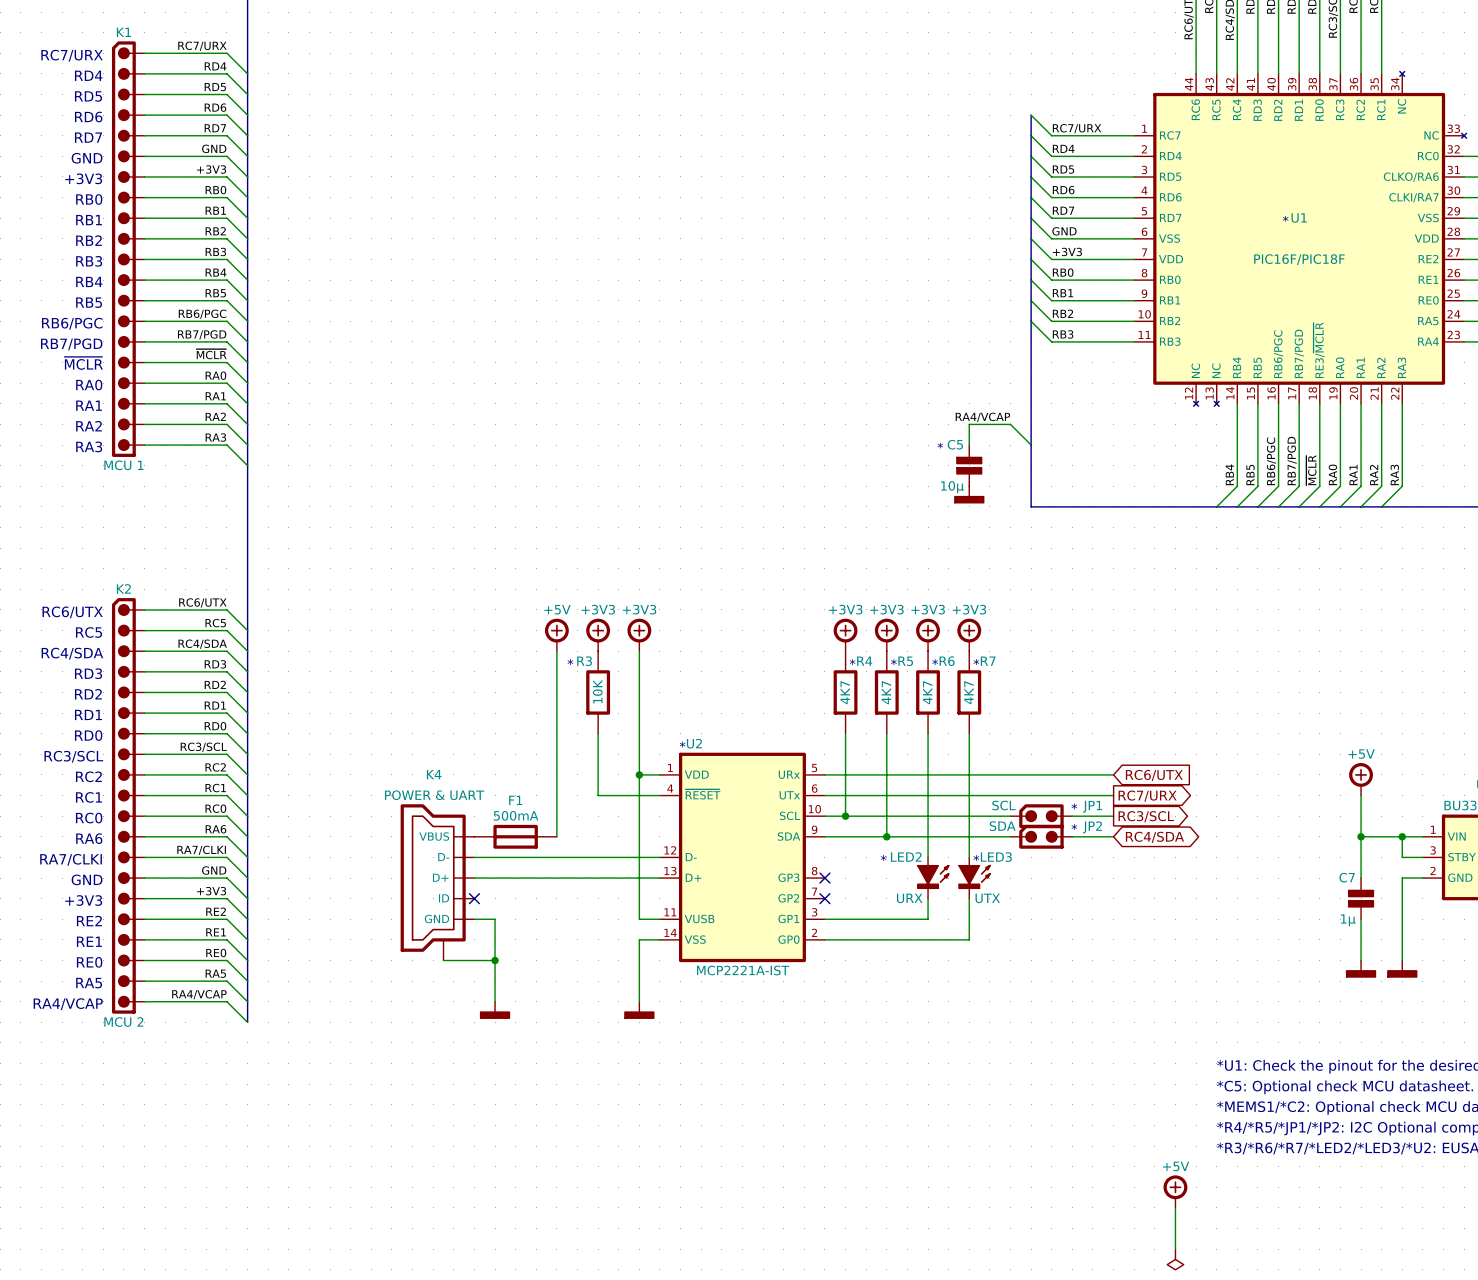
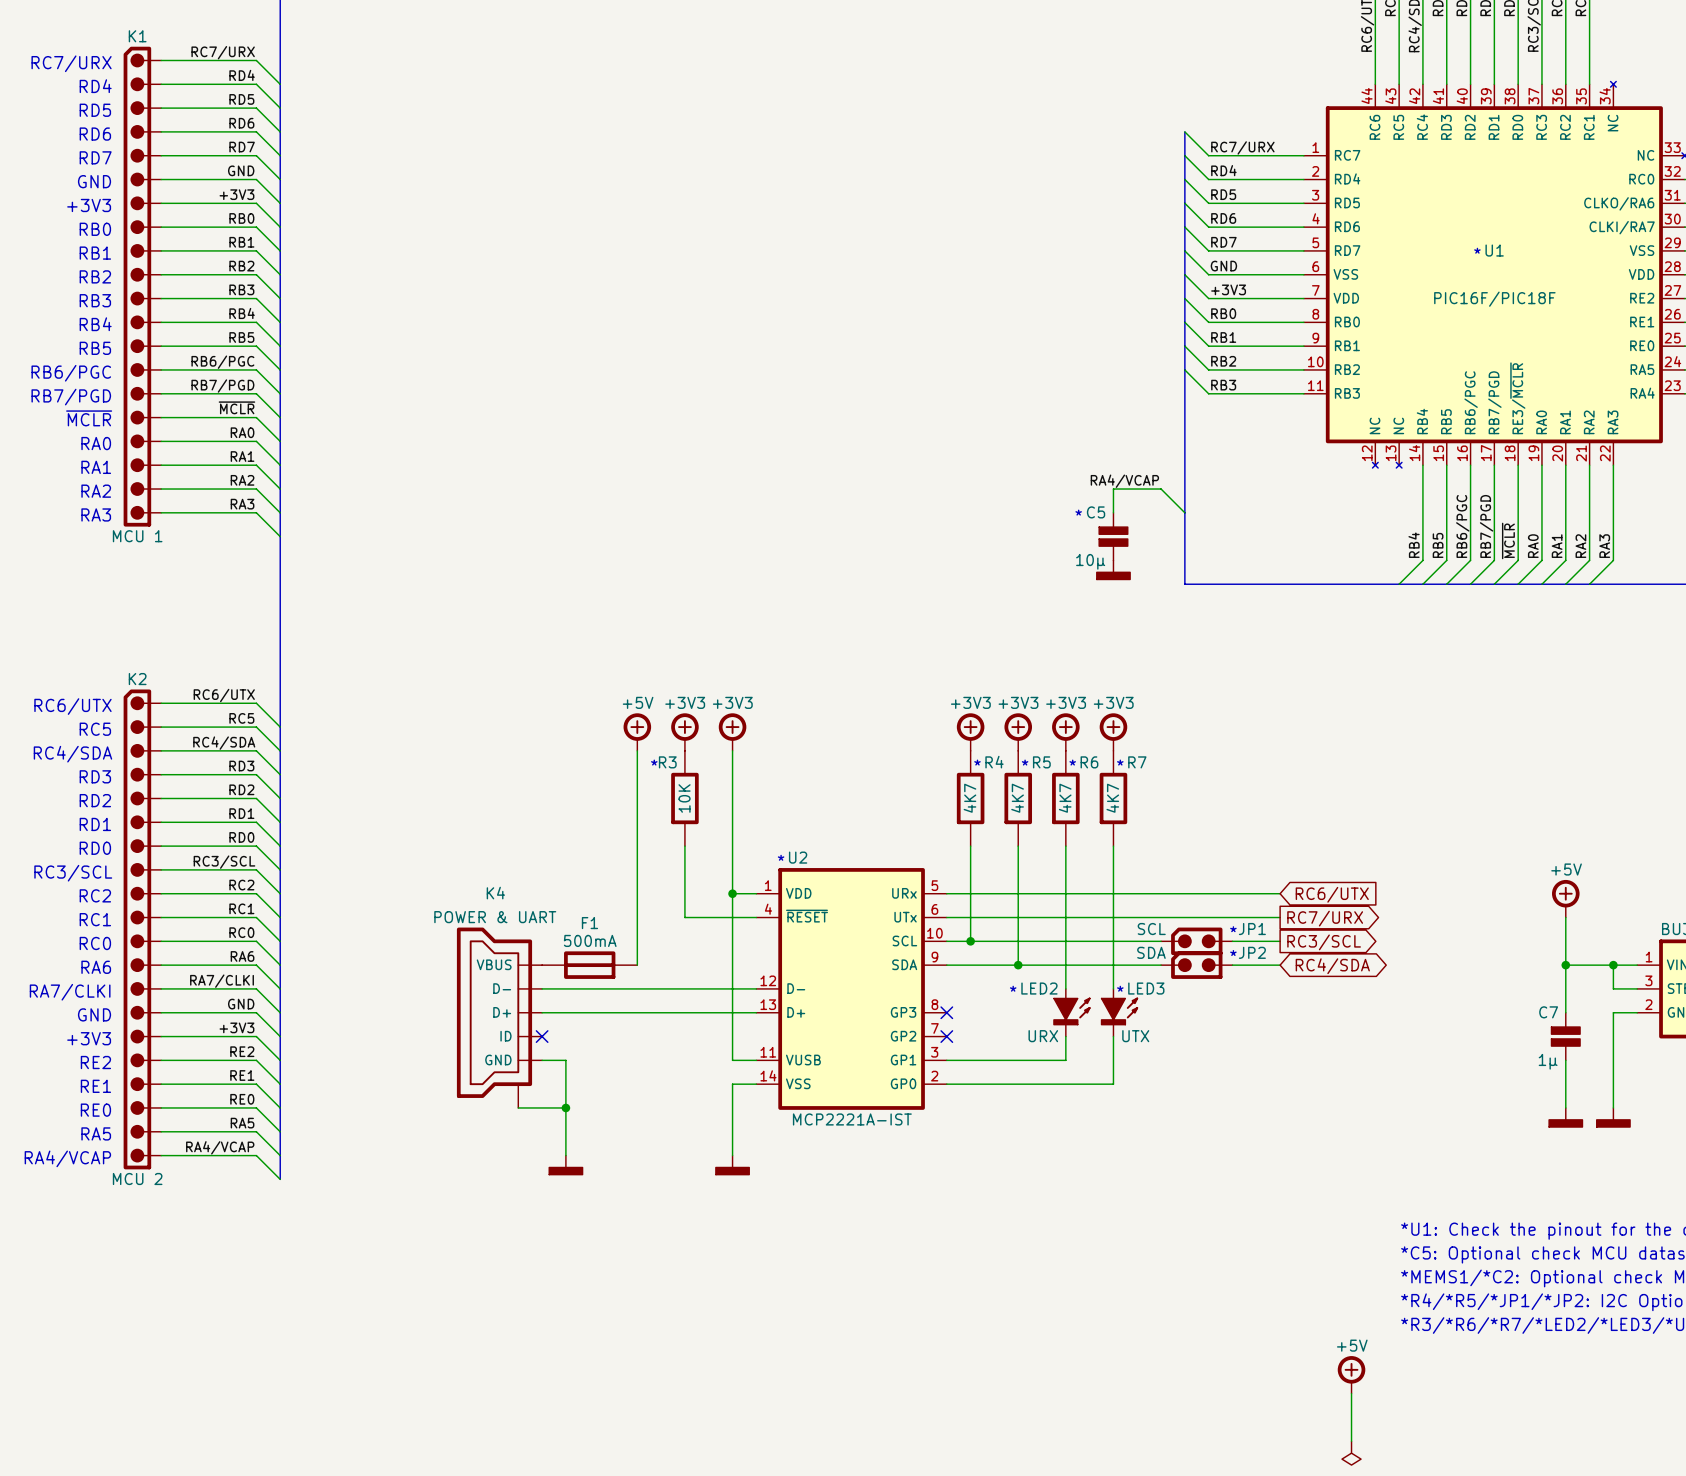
K4 symbol: [400, 804, 475, 961] -> [456, 927, 543, 1108]
wire: (443, 960) (453, 960) -> none

